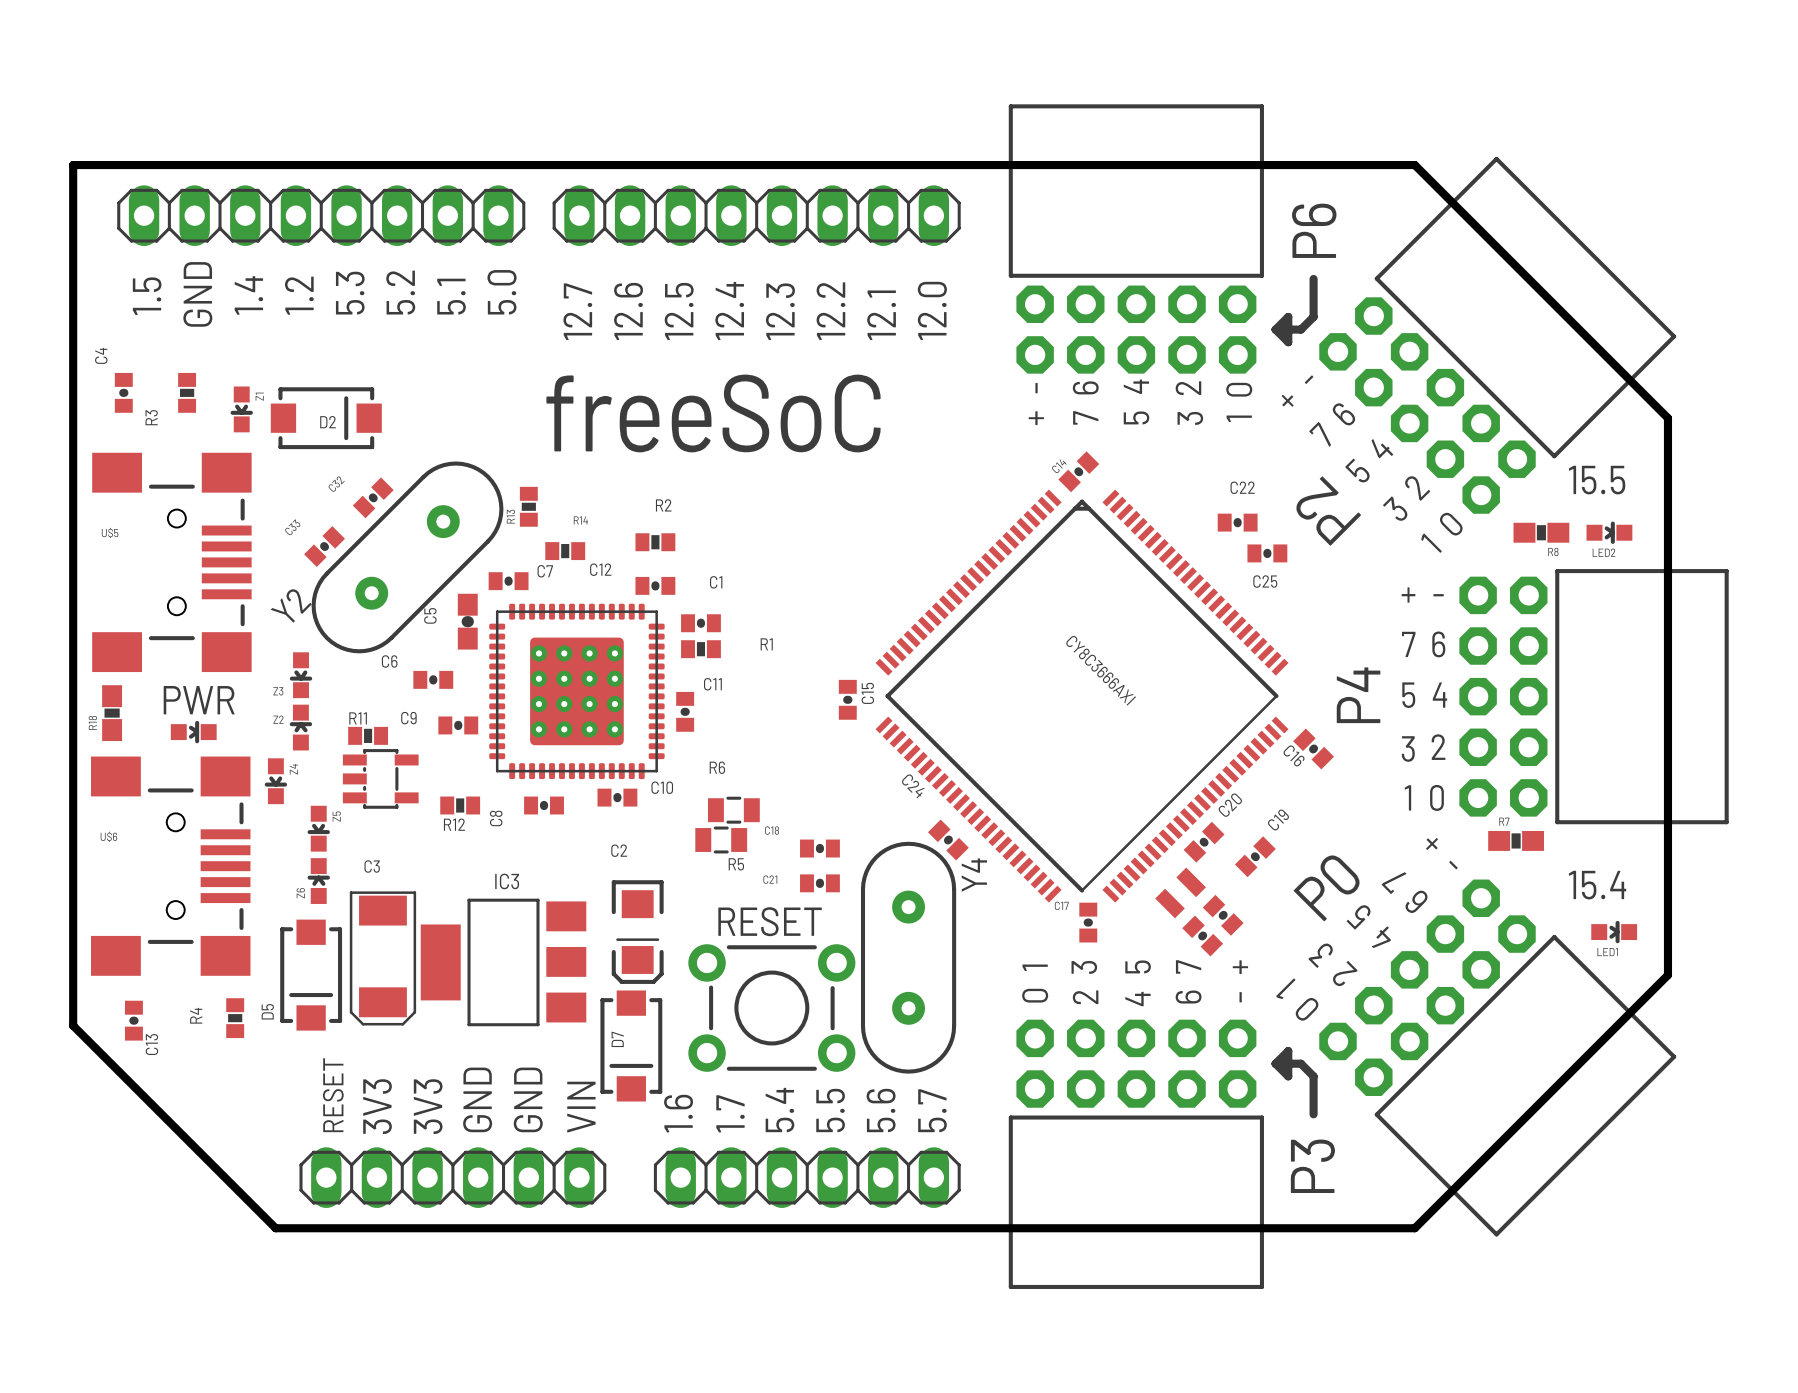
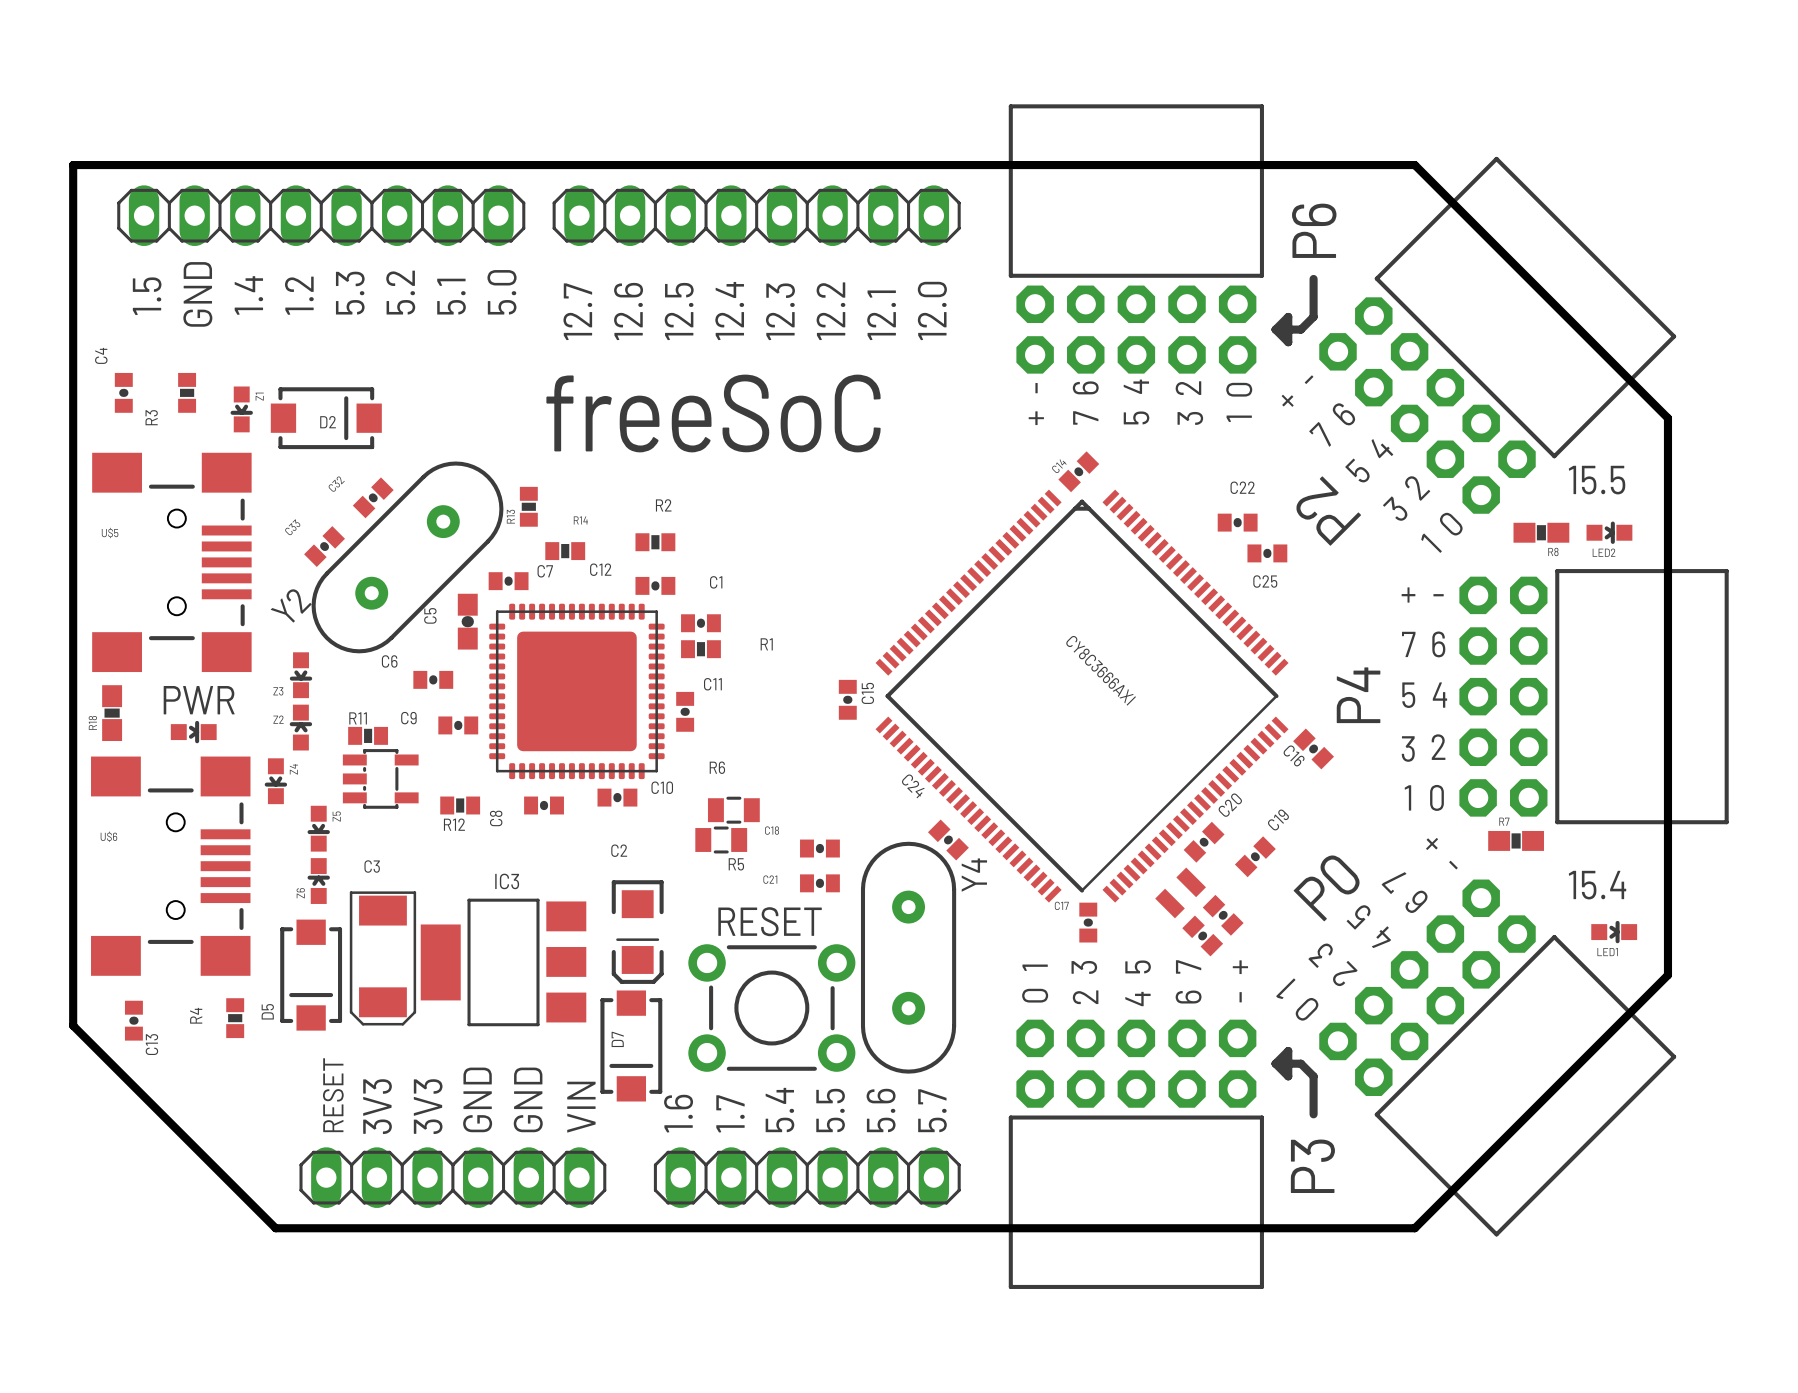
part footprint: [489, 603, 665, 780] -> [489, 603, 665, 780]

